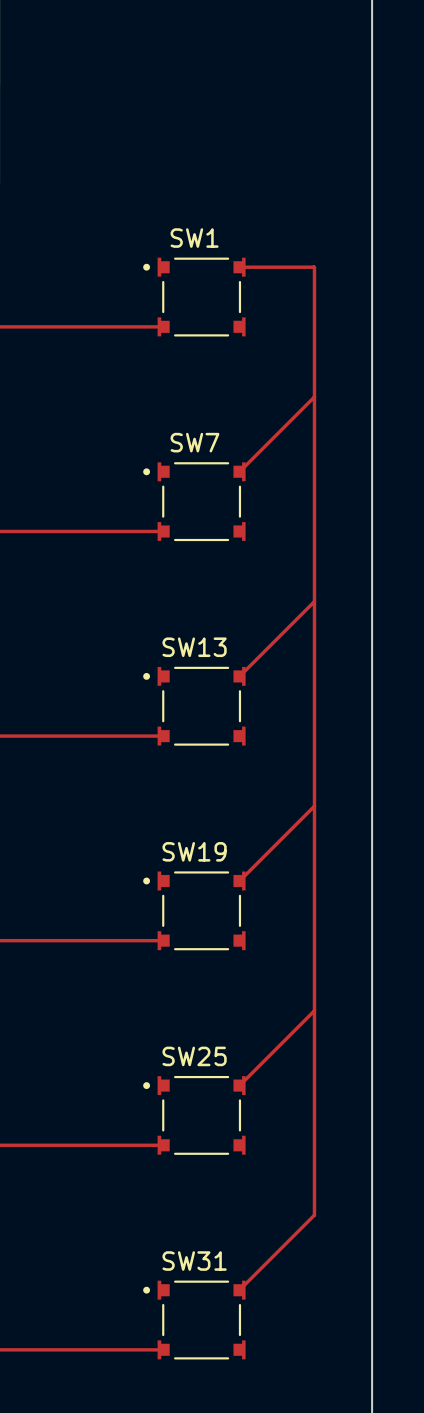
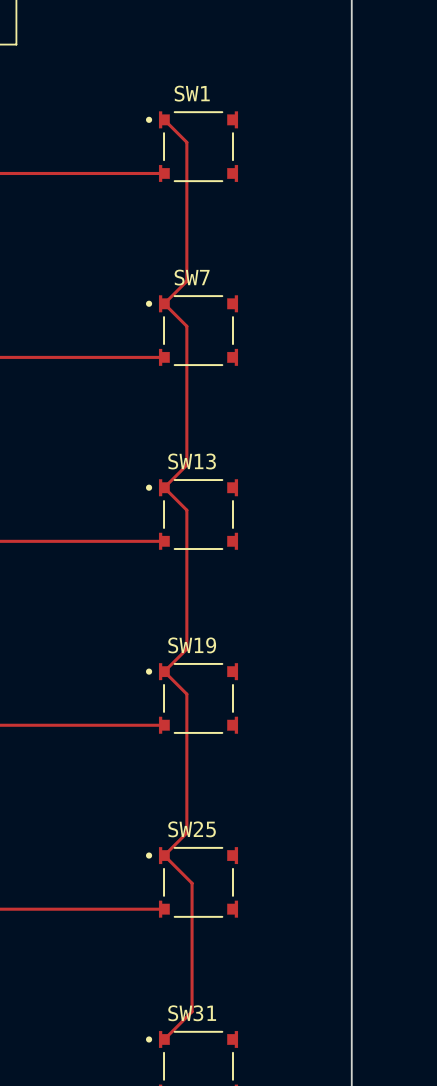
top track: none -> (164, 119) (186, 142) (186, 281) (164, 303) (186, 326) (186, 465) (164, 487) (186, 510) (186, 649) (164, 671) (186, 694) (186, 833) (164, 855) (192, 883) (192, 1011) (164, 1039)
top track: (239, 267) (313, 267) -> none
top track: (313, 267) (314, 1215) (239, 1290) -> none
top track: (314, 396) (239, 471) -> none
top track: (314, 601) (239, 676) -> none
top track: (314, 806) (239, 880) -> none
top track: (314, 1010) (239, 1085) -> none

